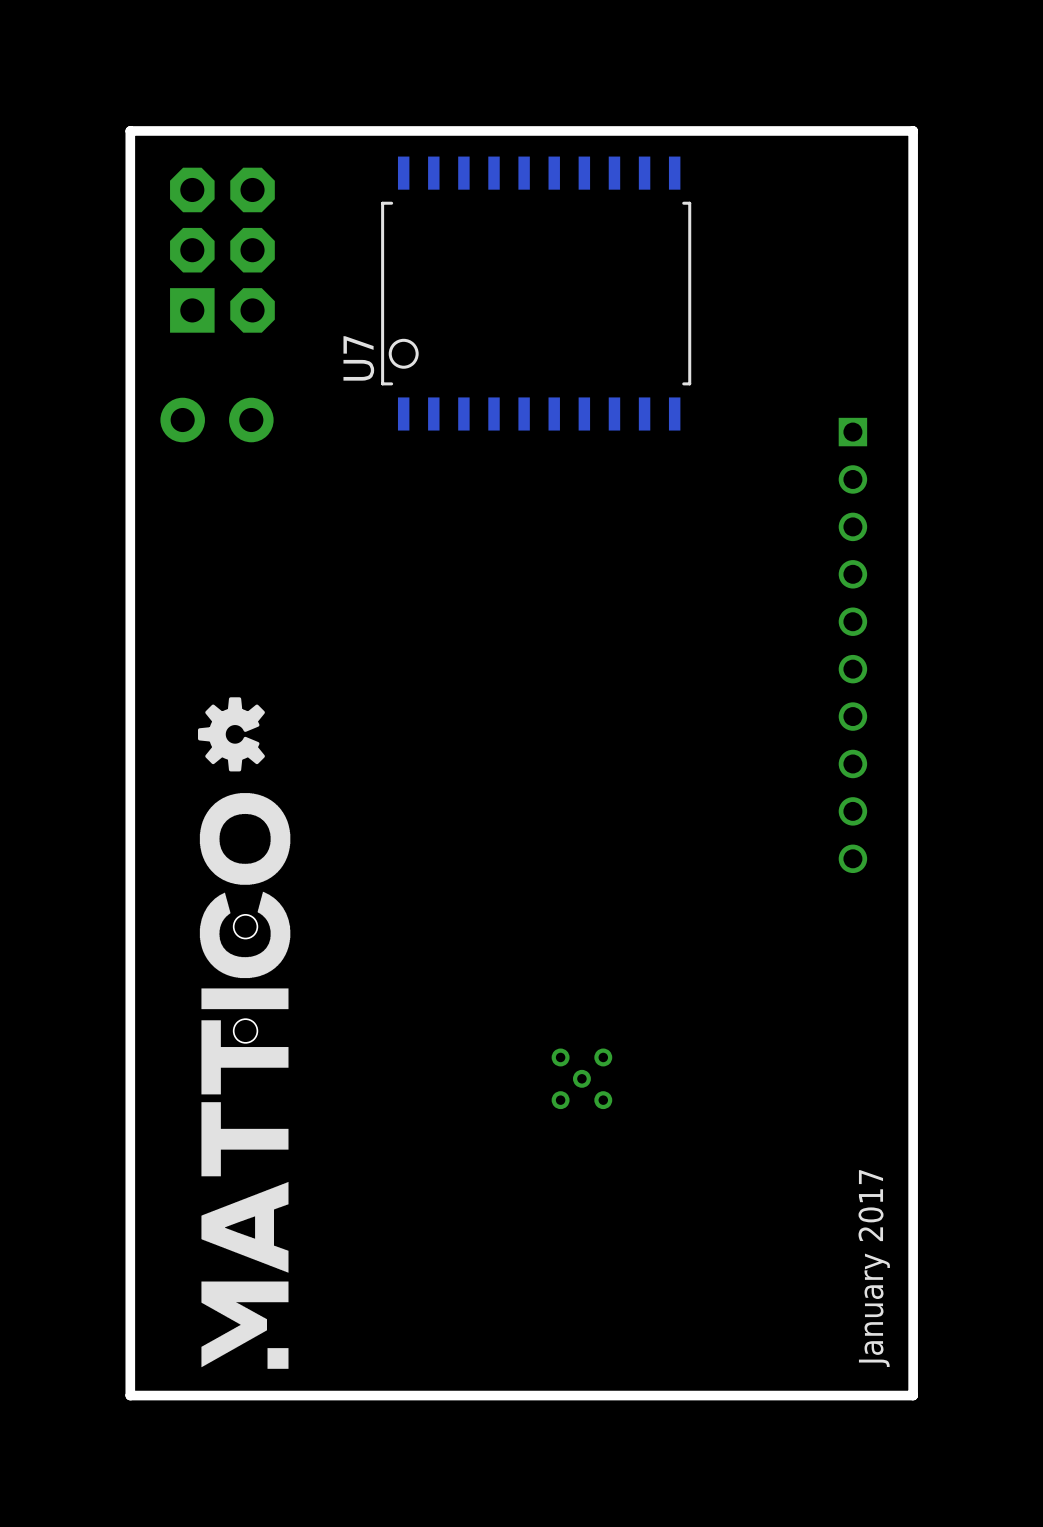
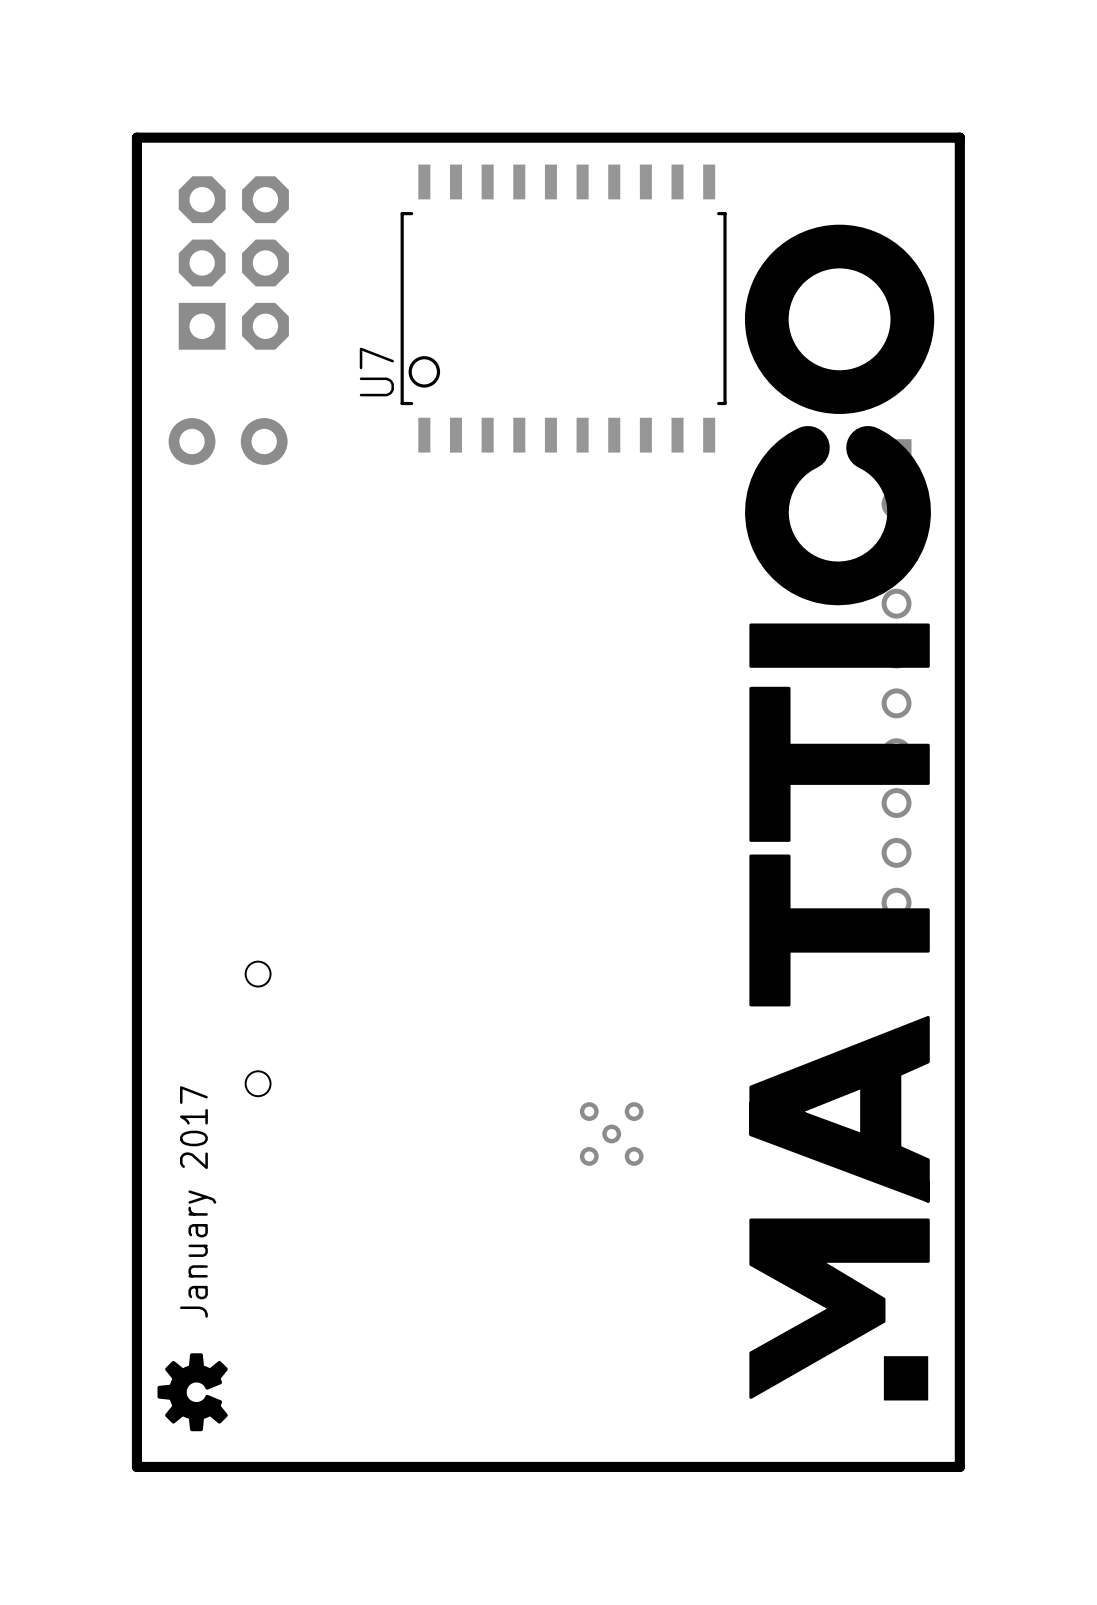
drawing: none -> [744, 224, 935, 1401]
drawing position: (231, 734) -> (192, 1392)
drawing: [199, 793, 291, 1369] -> none
text: none -> January 2017 (198, 1201)
text: January 2017 (874, 1268) -> none

